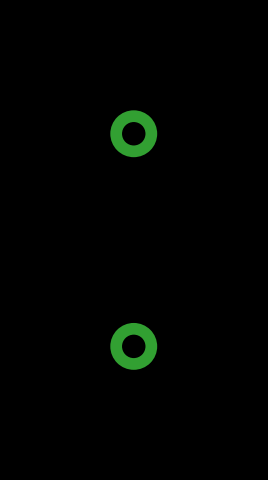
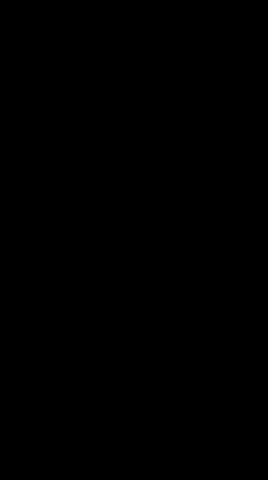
part: (133, 133) -> none
part: (133, 346) -> none

